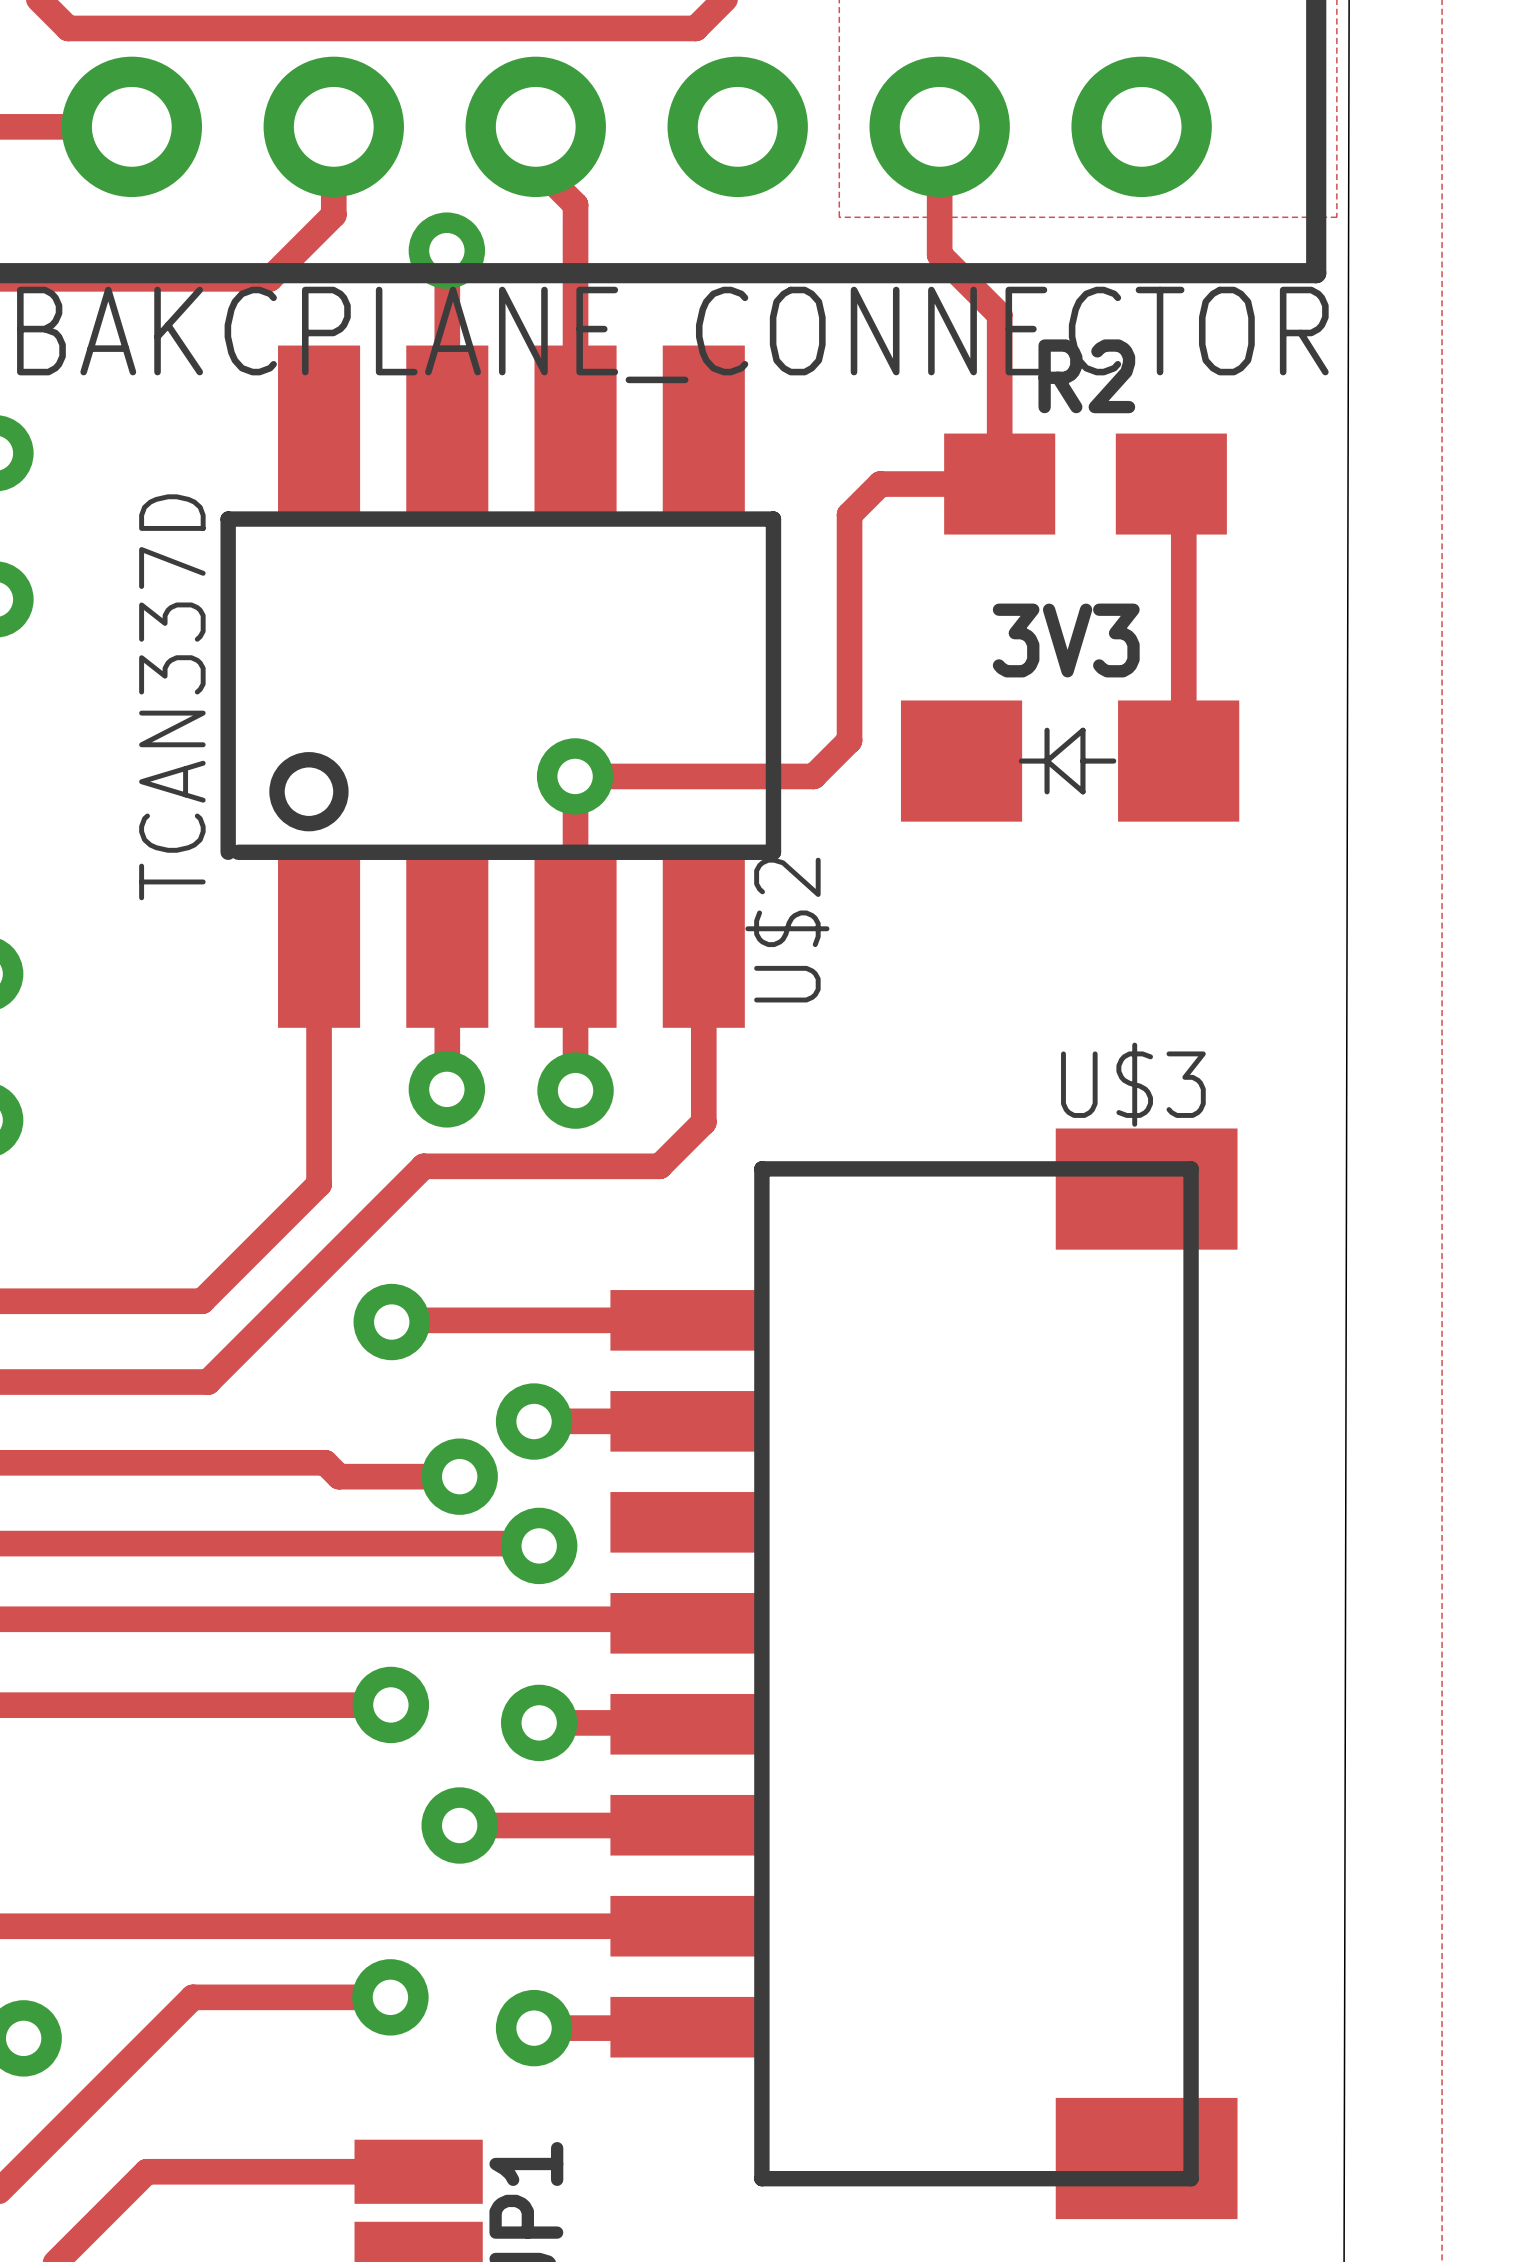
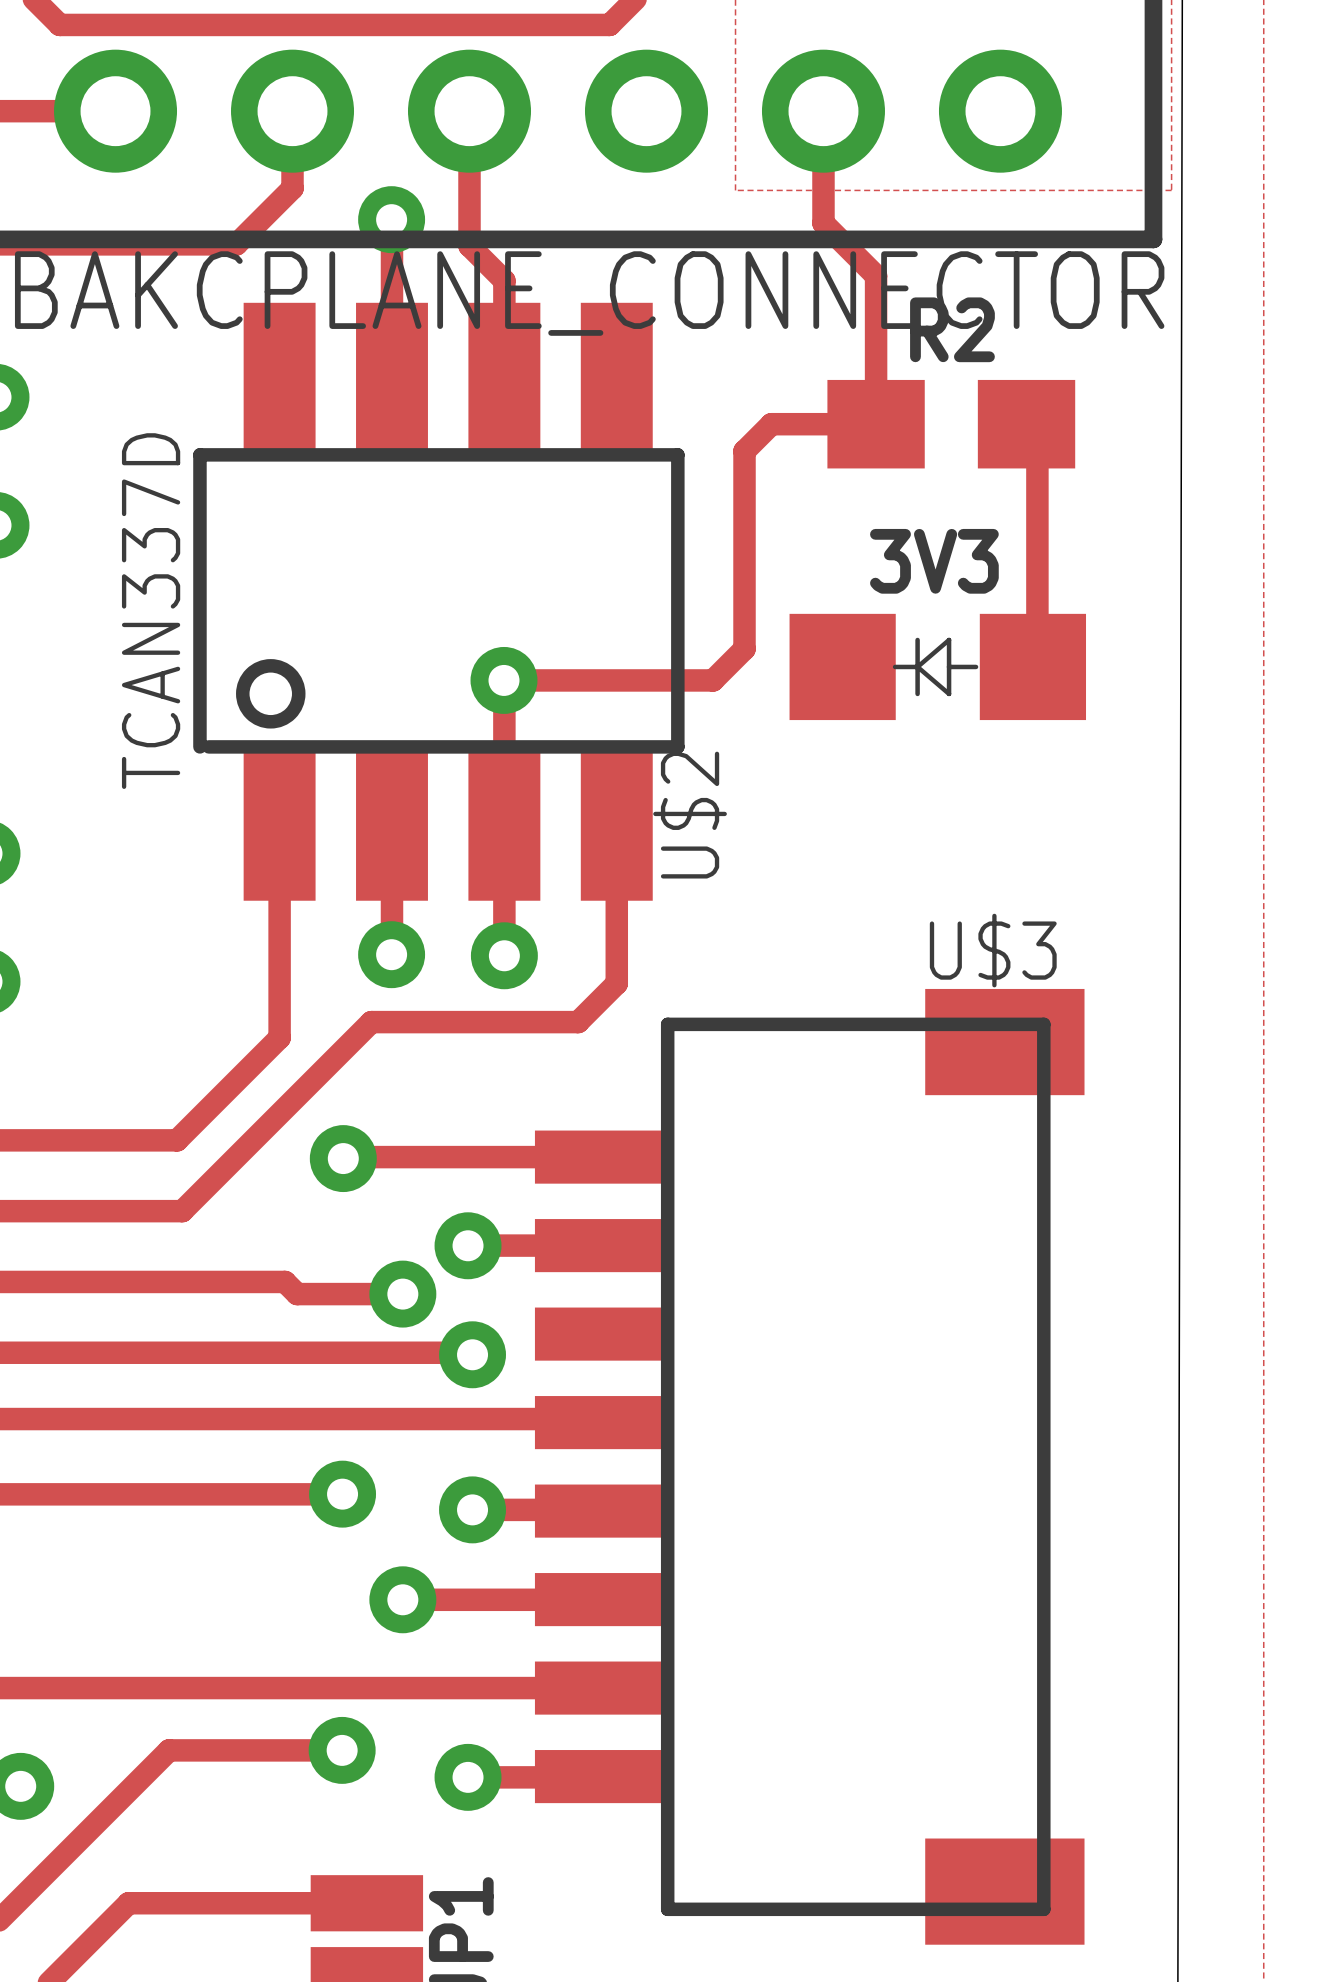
track: (535, 165) (575, 204) (575, 320) -> (469, 144) (469, 245) (504, 280)

